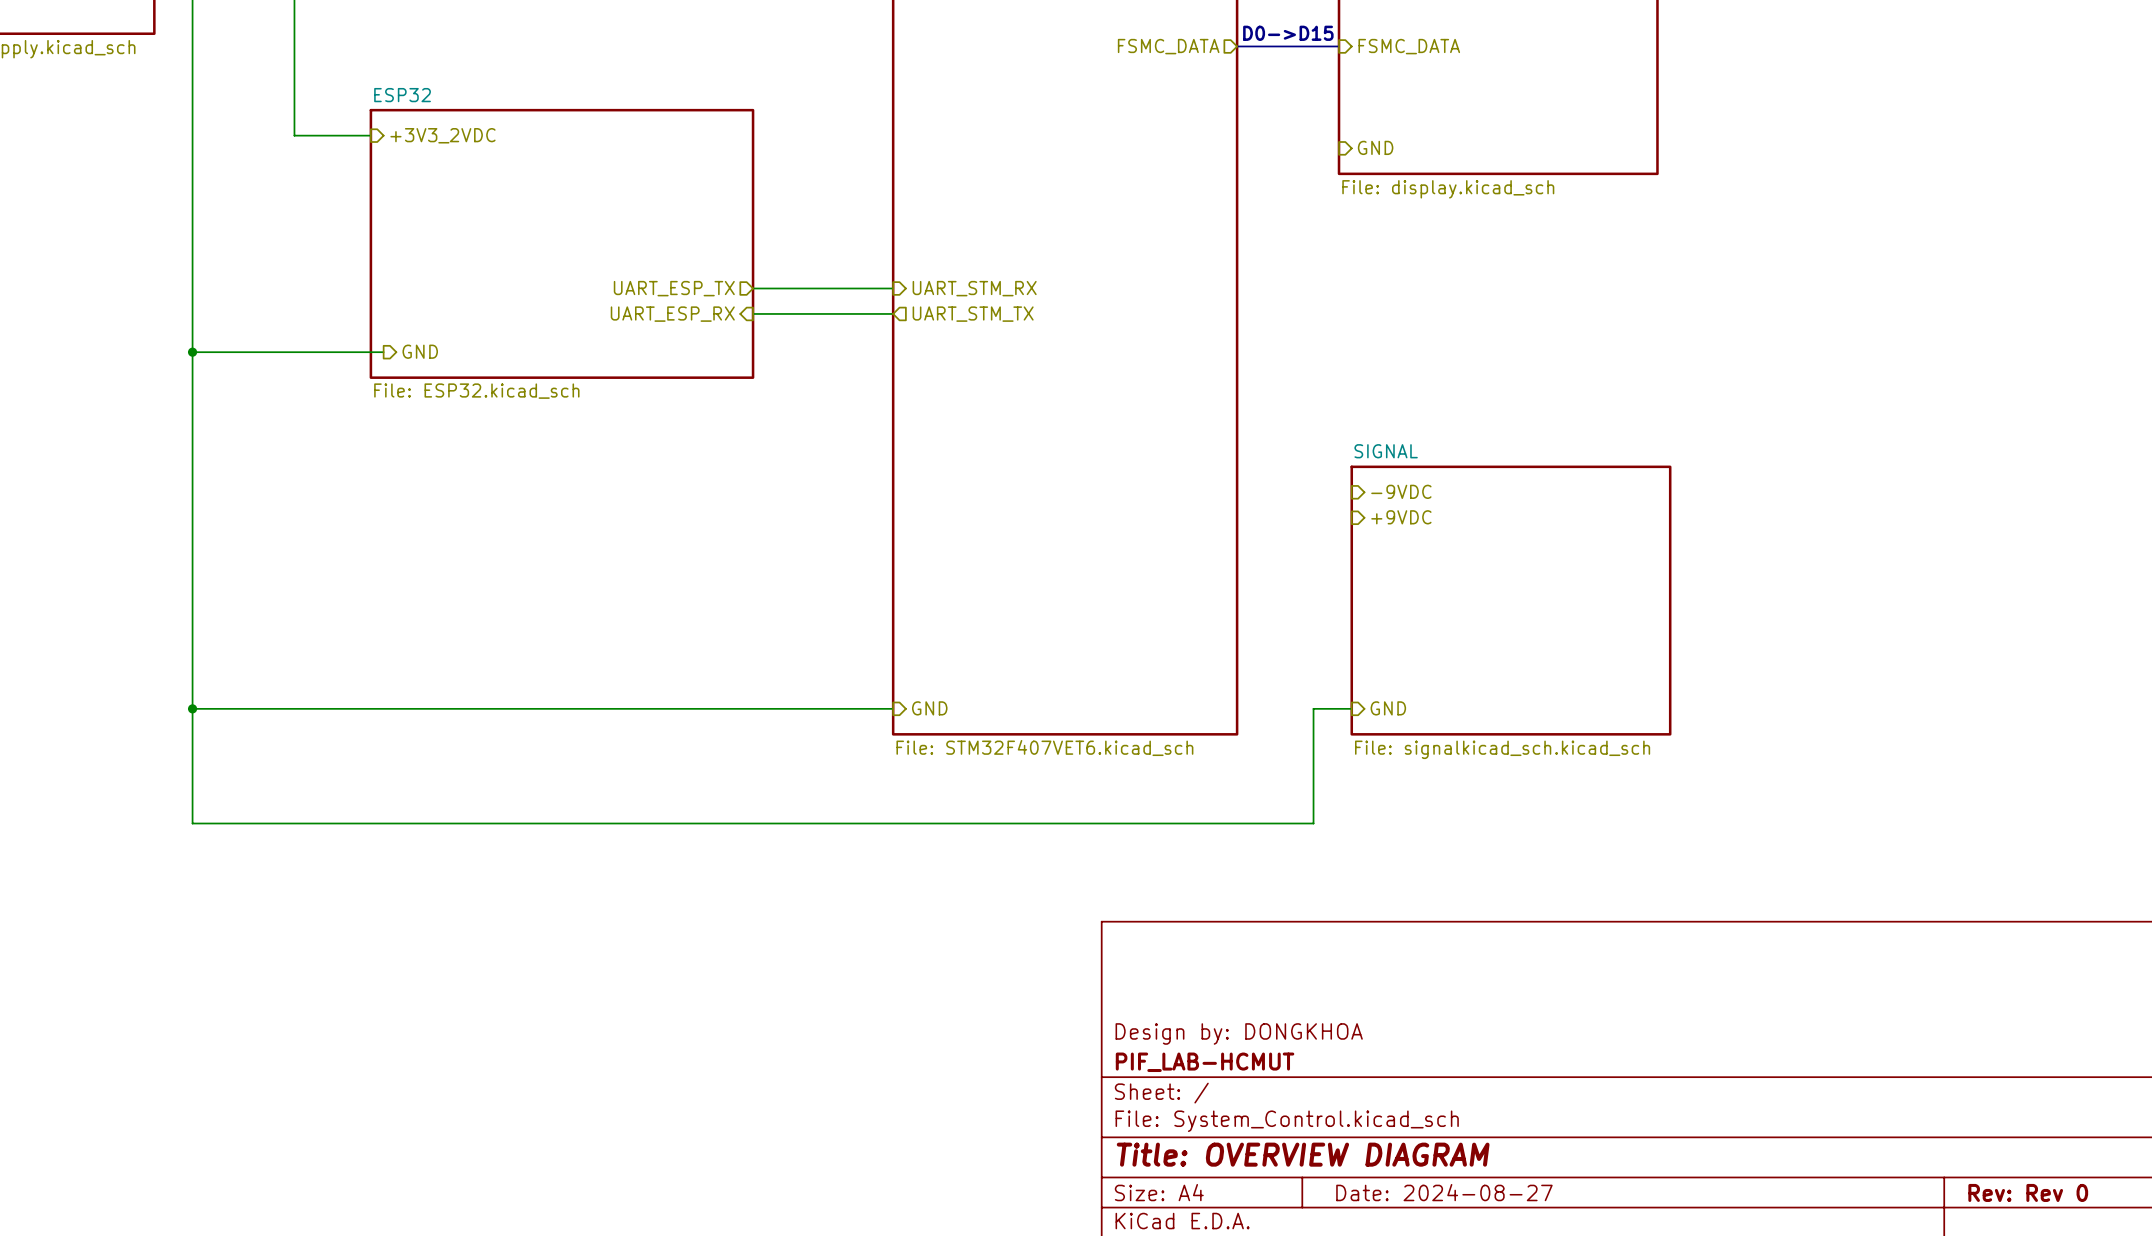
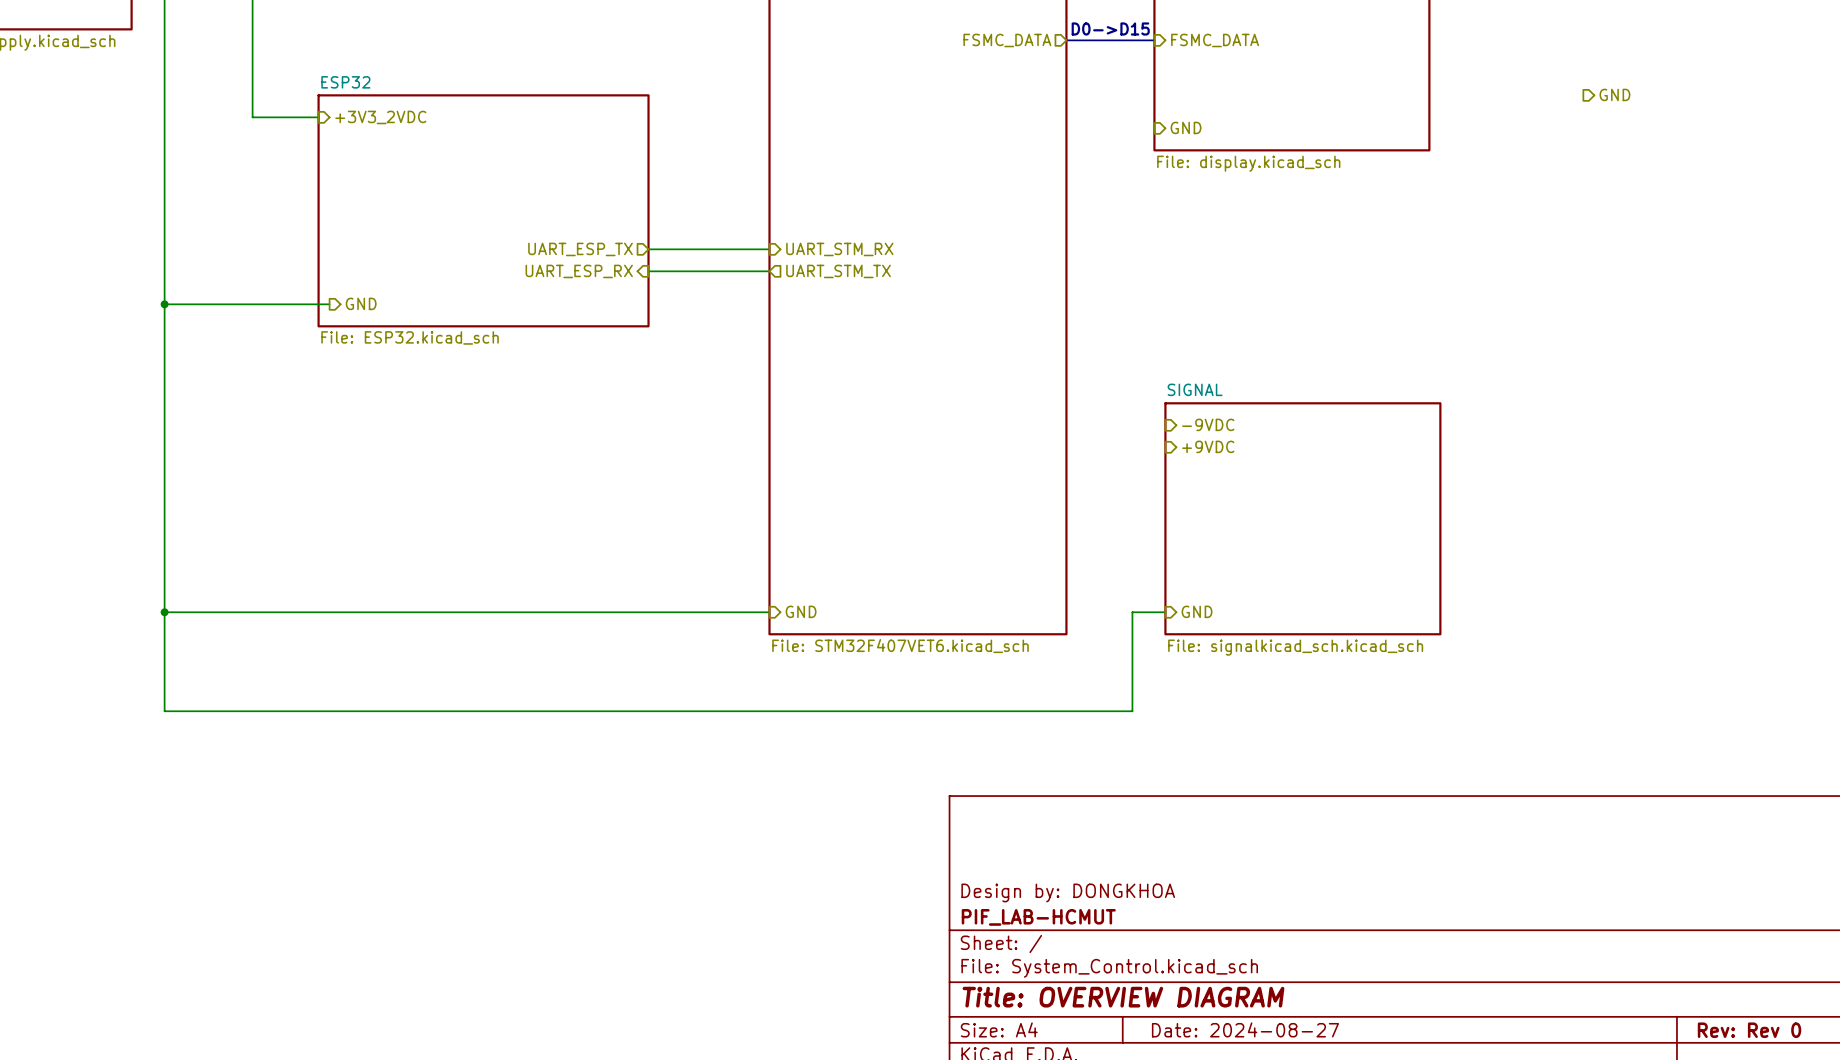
hierarchical label: none -> GND (1614, 94)

